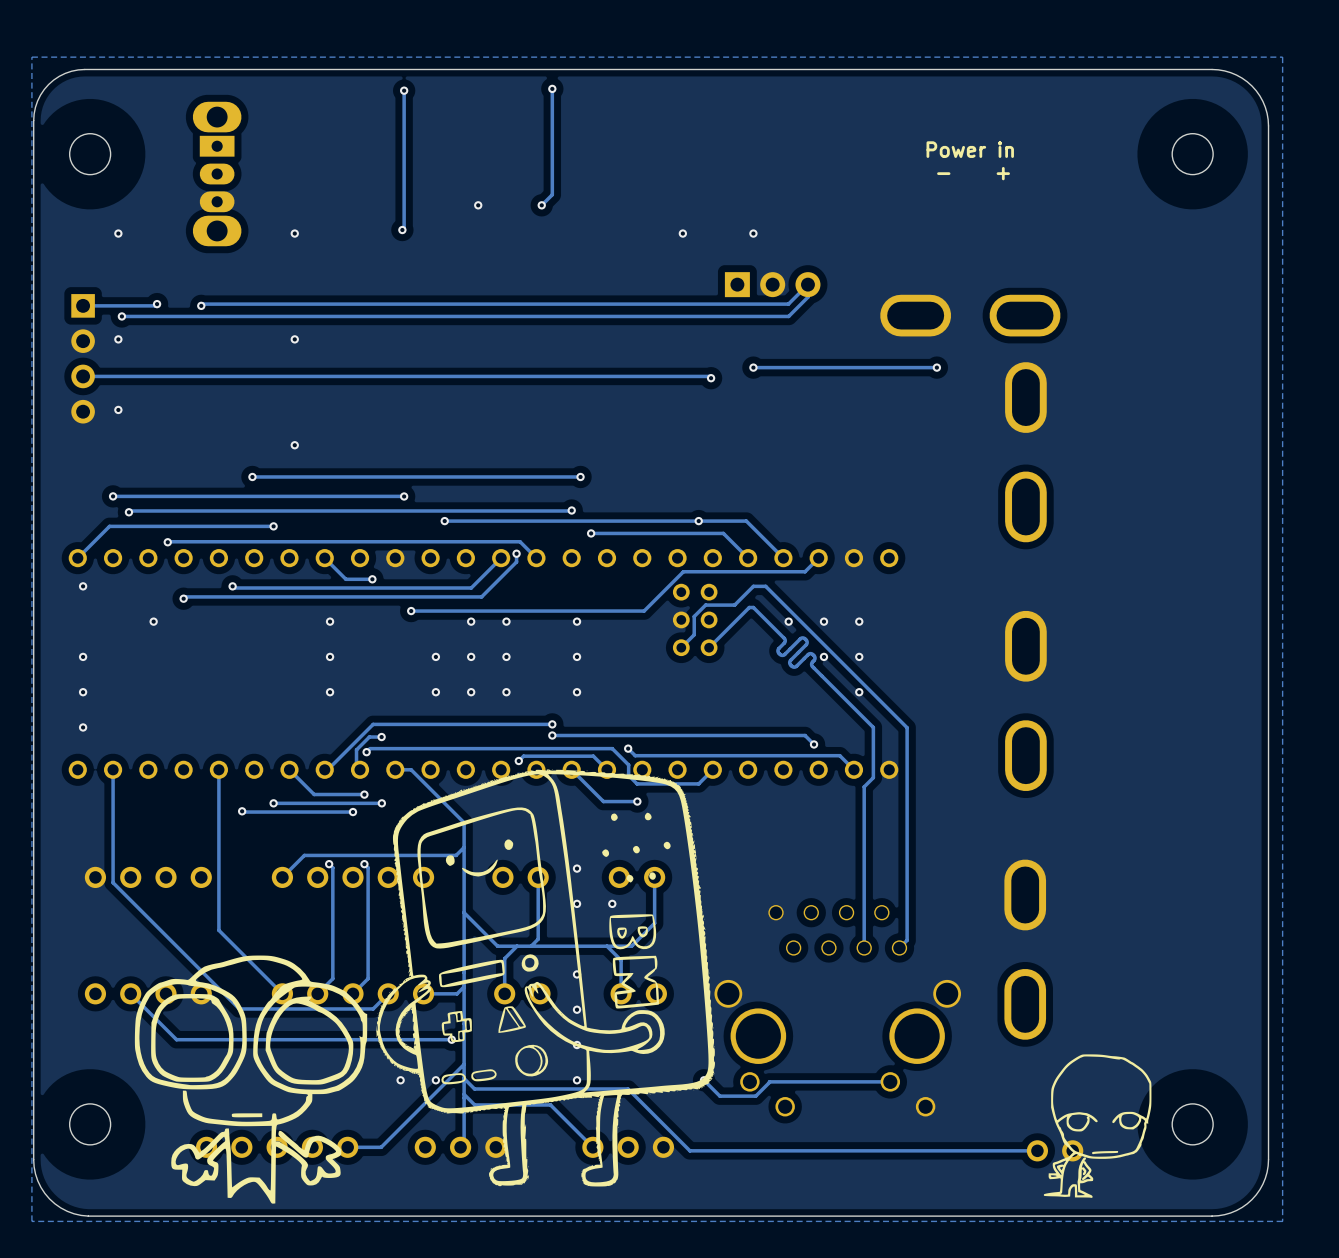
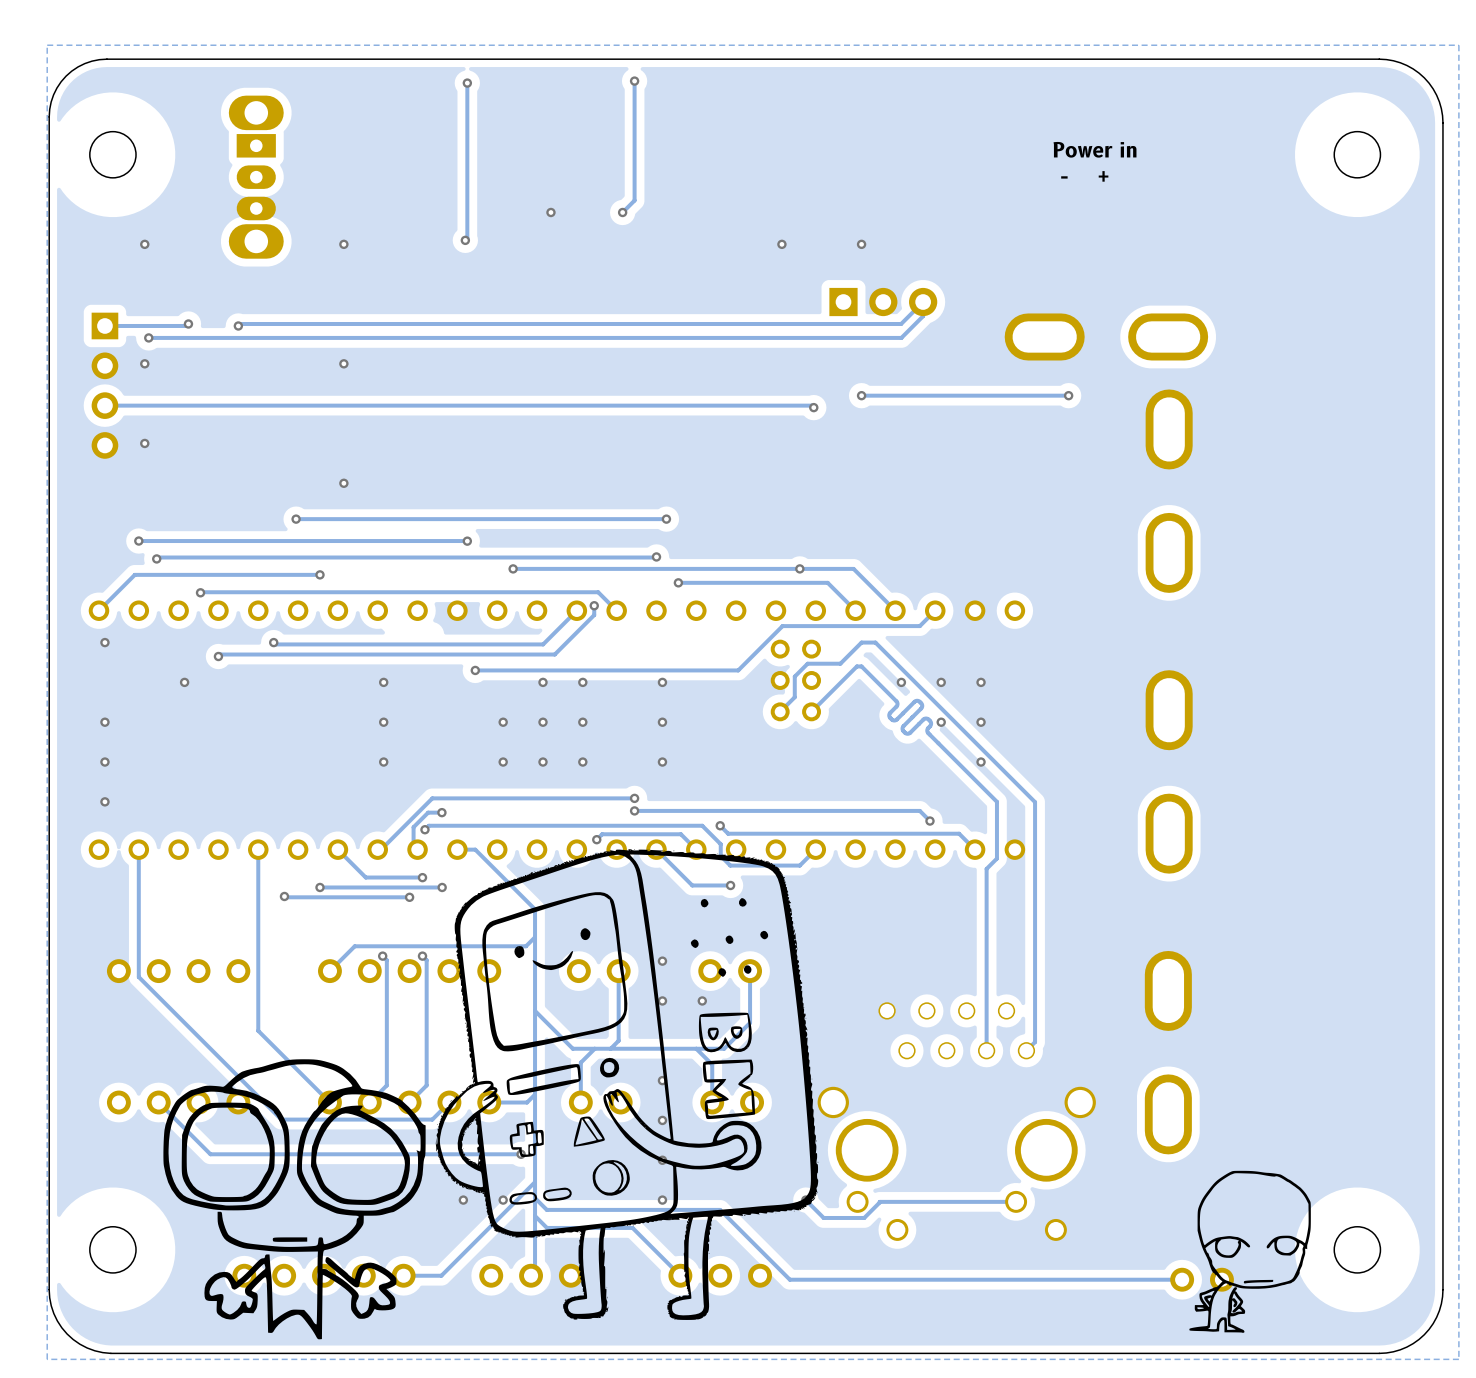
track: (324, 558) (345, 579) (372, 579) -> none
via: (372, 579) -> none

